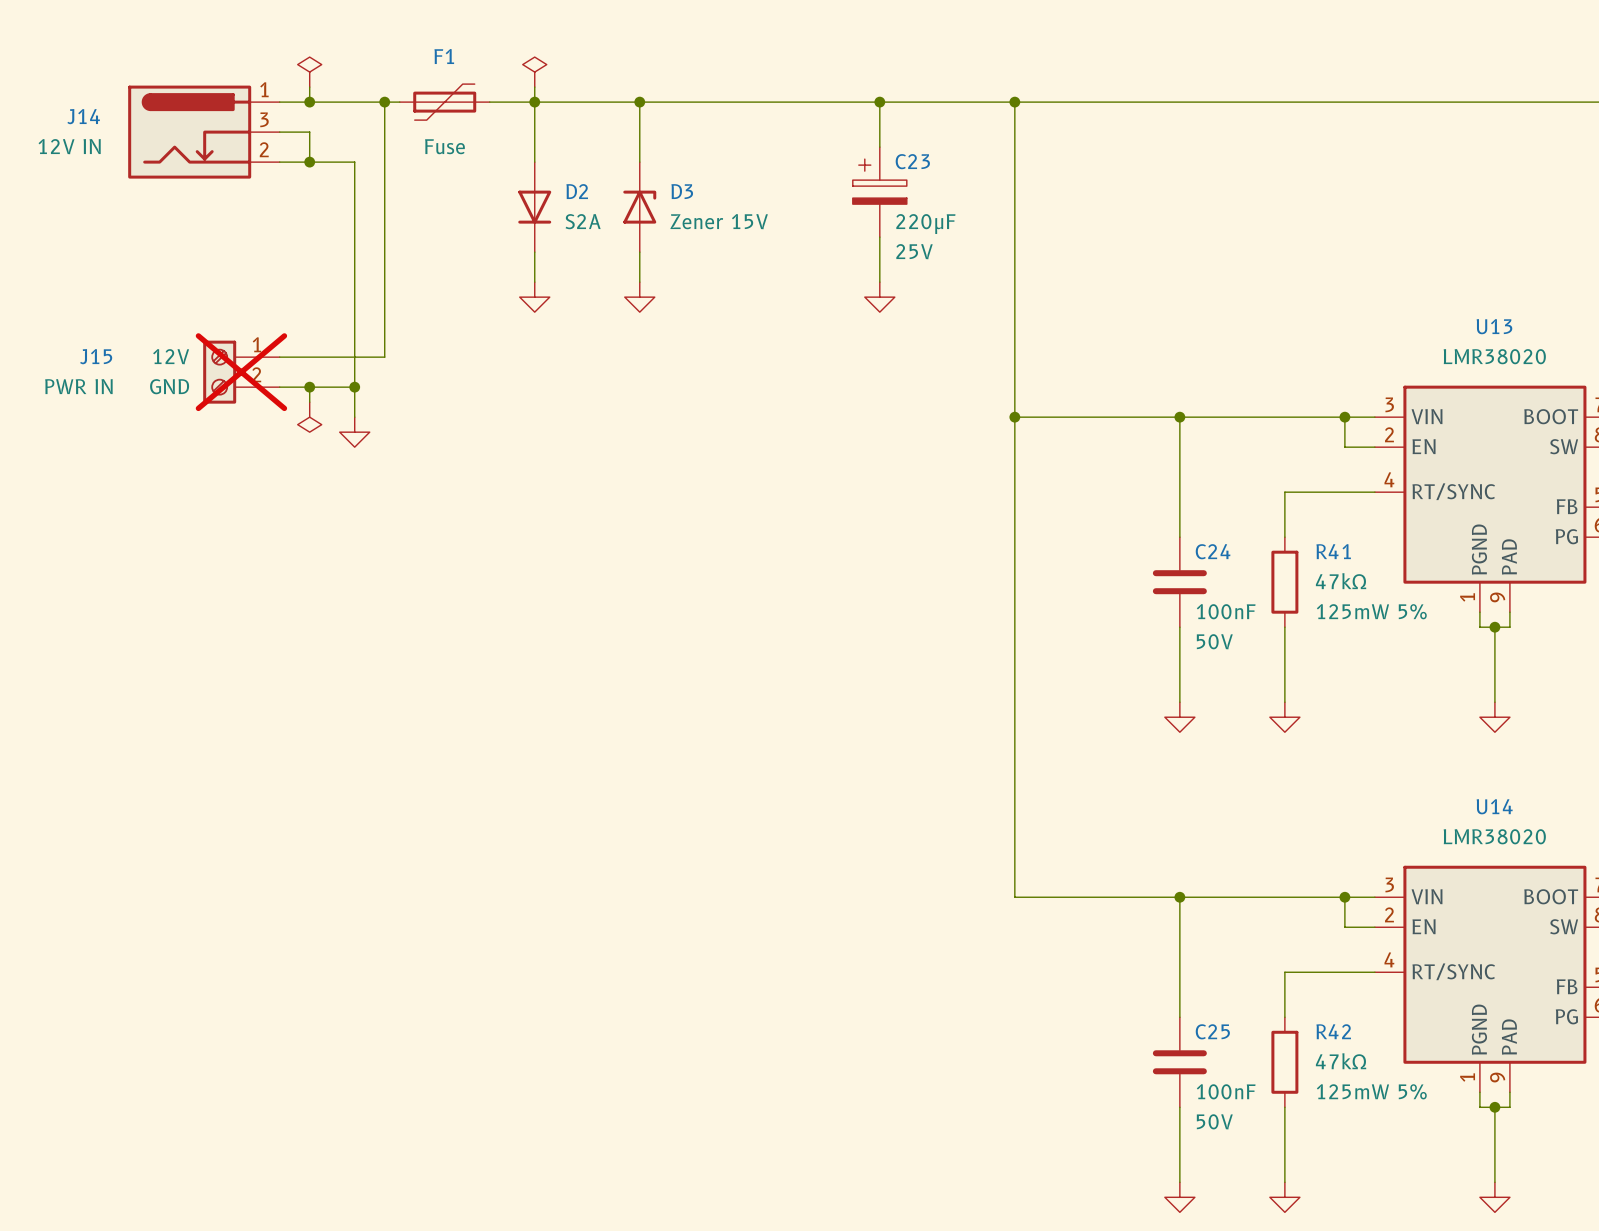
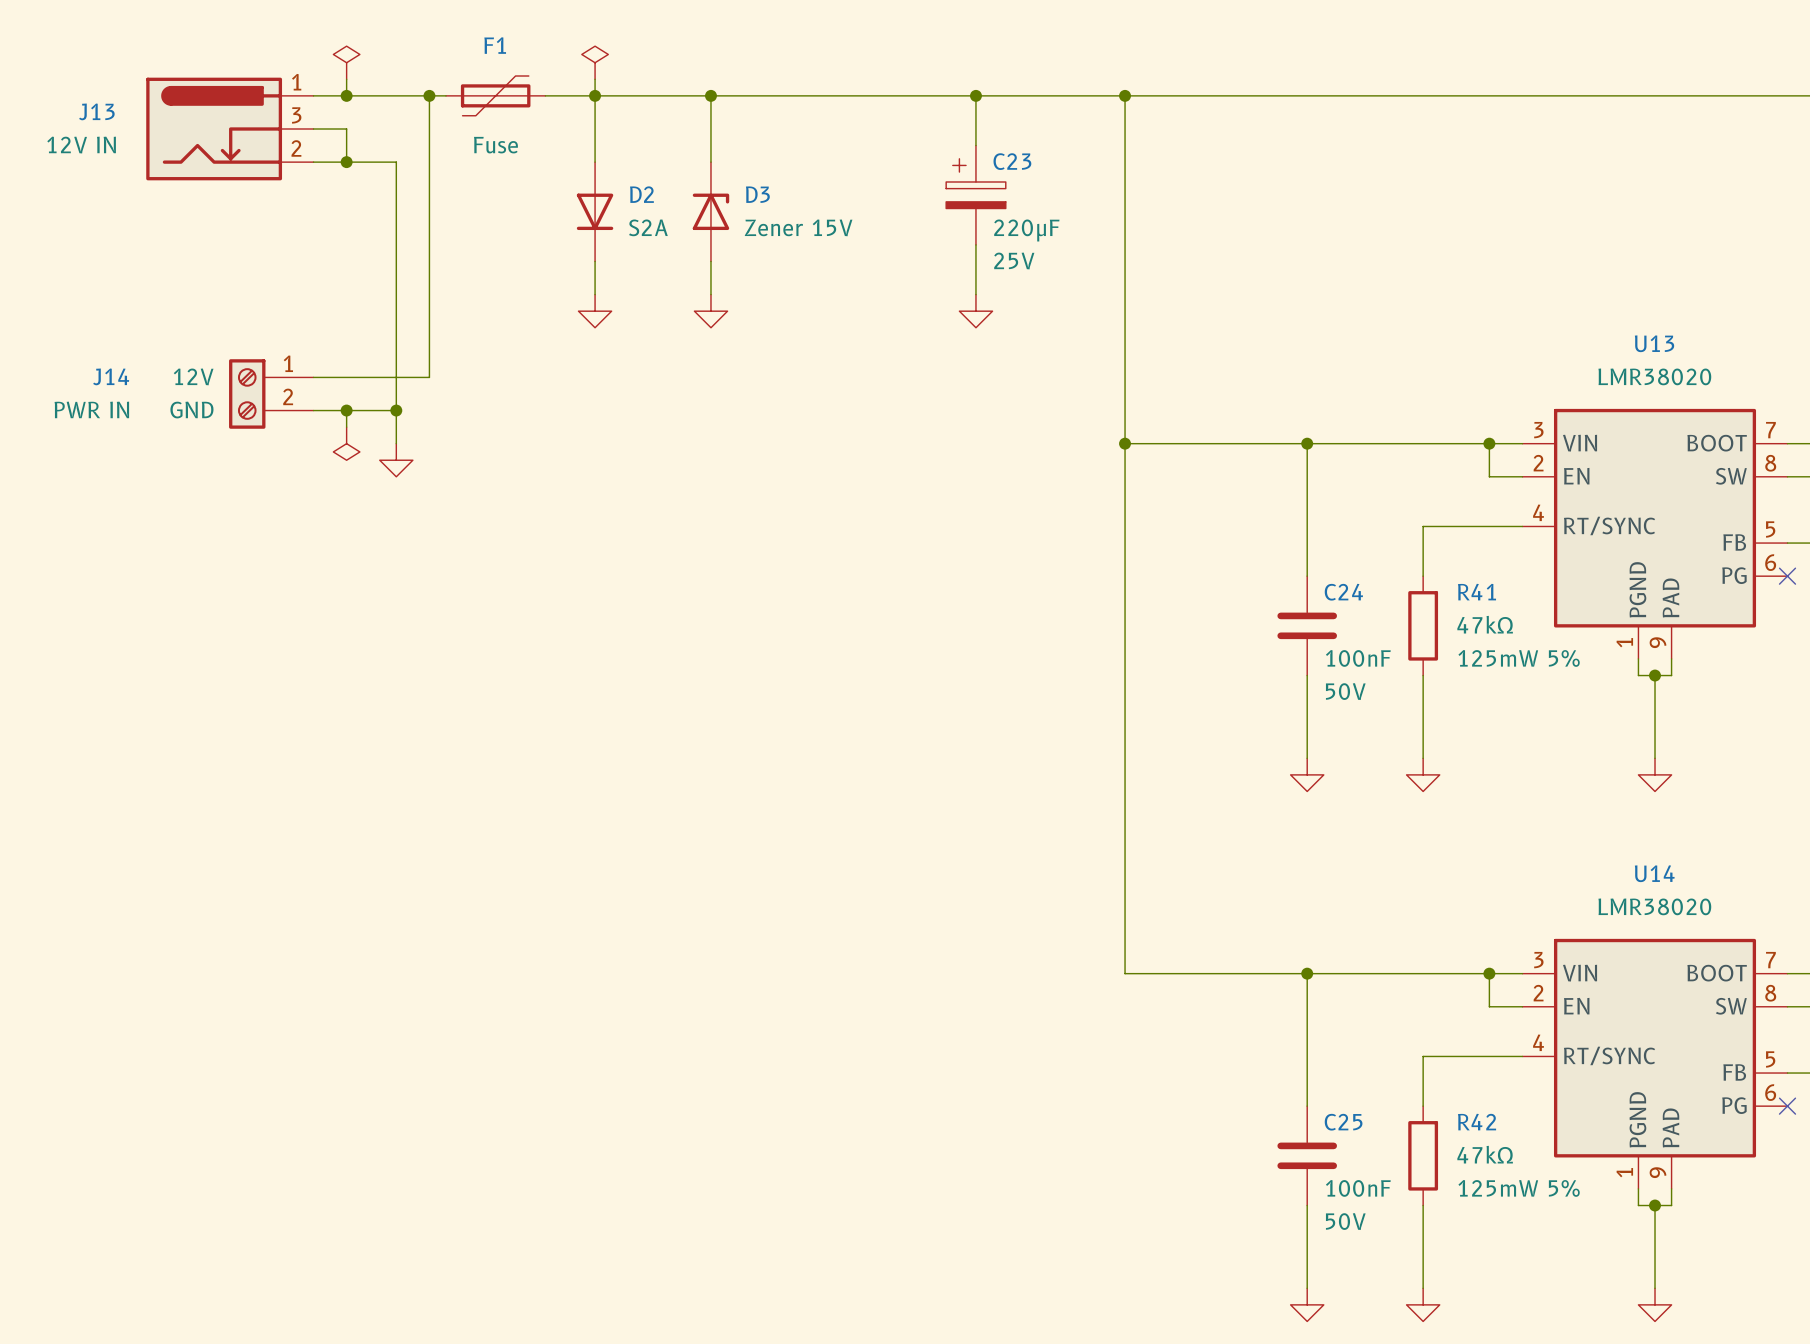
J14 name: J14 (83, 116) -> J13 (96, 111)
J15 name: J15 (96, 356) -> J14 (111, 376)
J15 do-not-place cross: (241, 372) -> none

